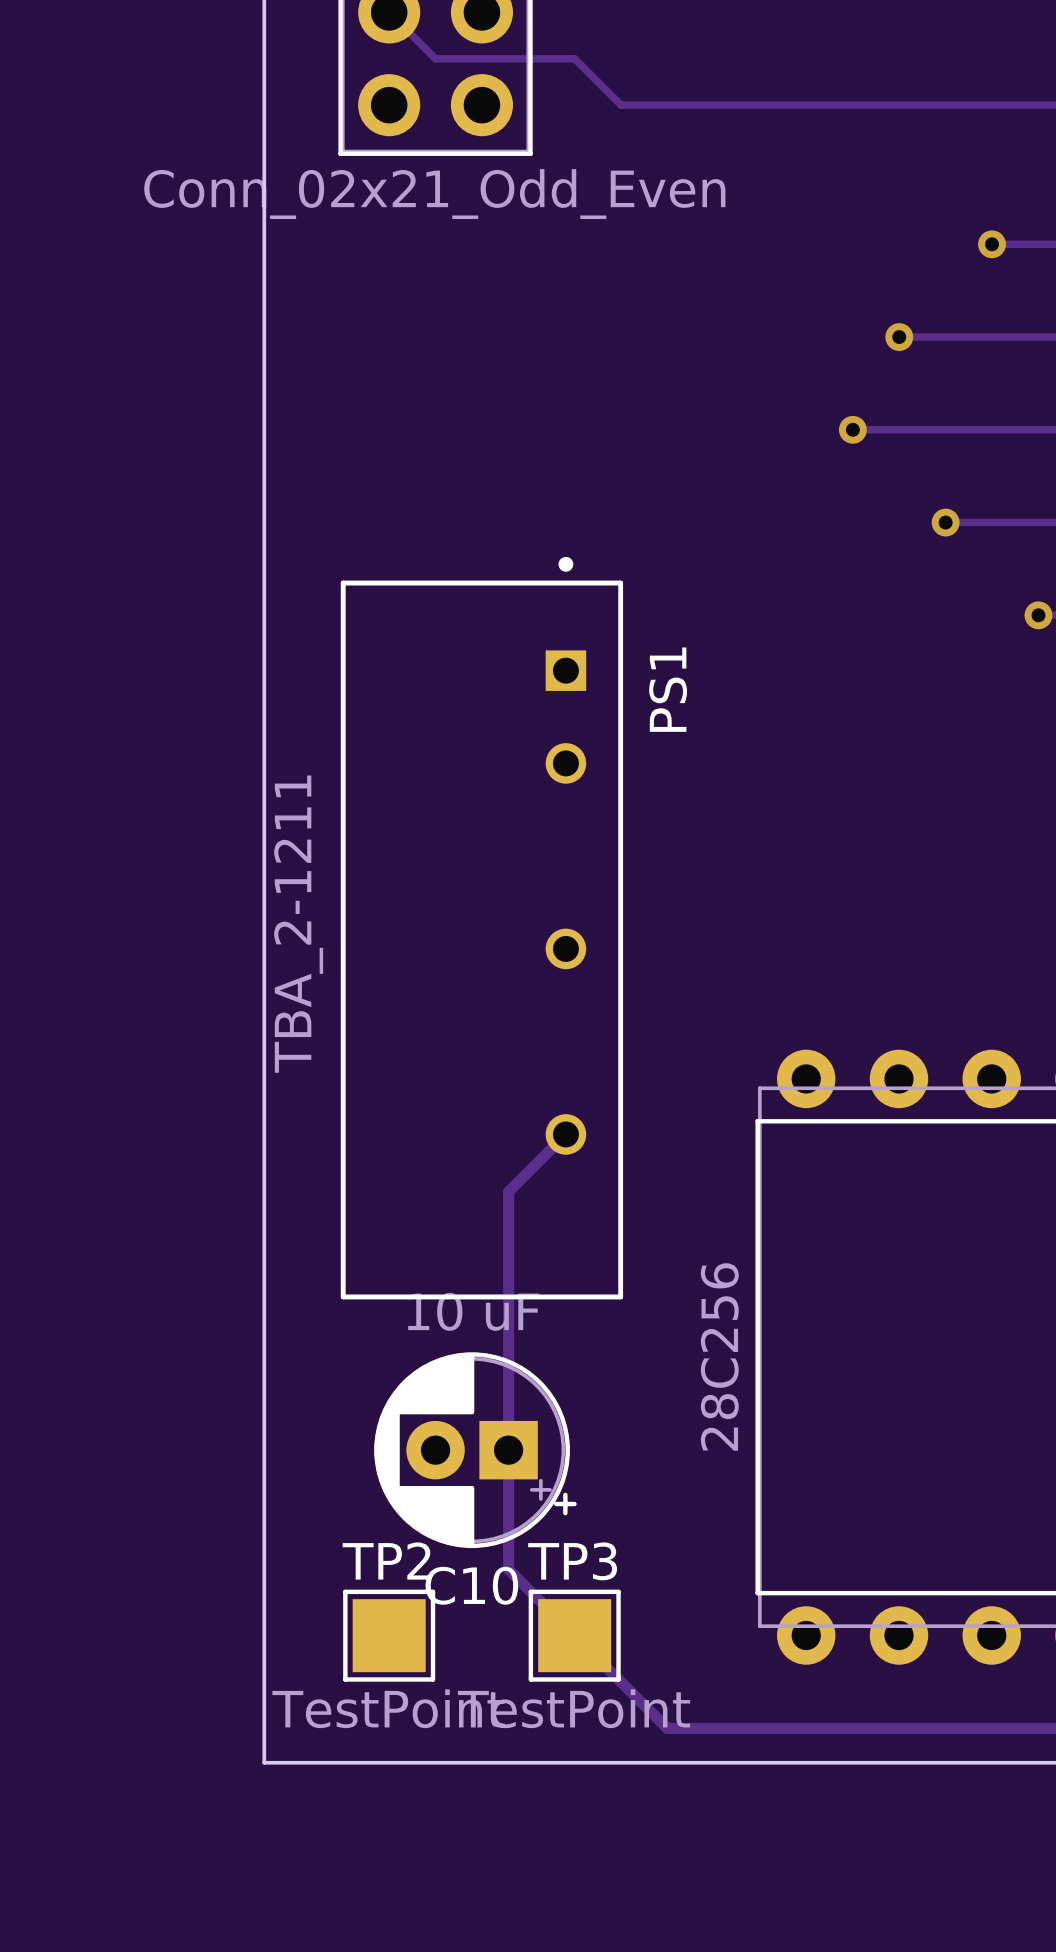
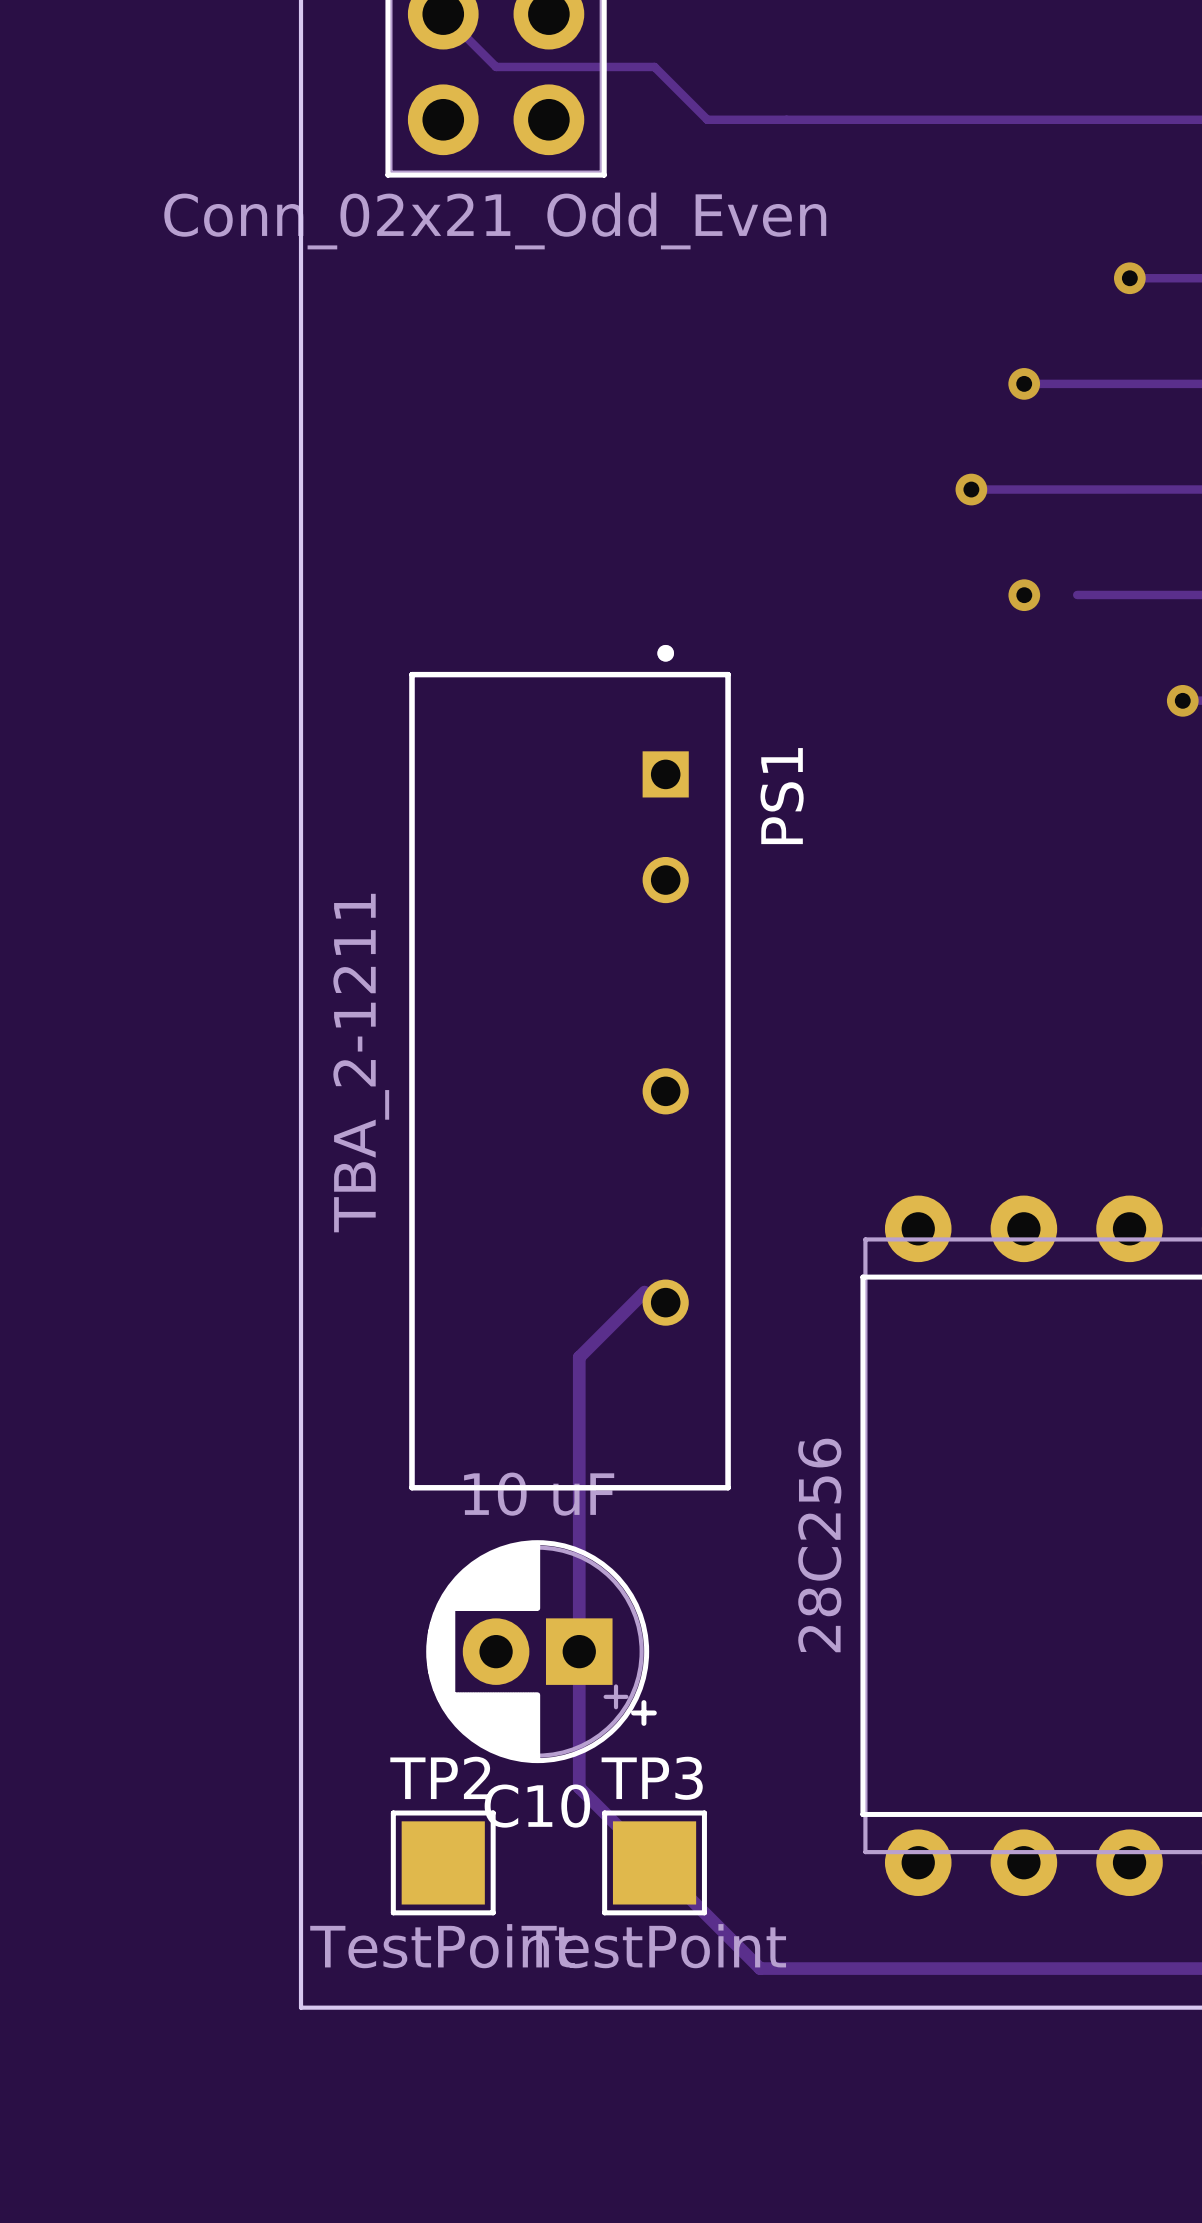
via position: (945, 522) -> (1024, 595)
PS1 position: (481, 928) -> (570, 1067)

